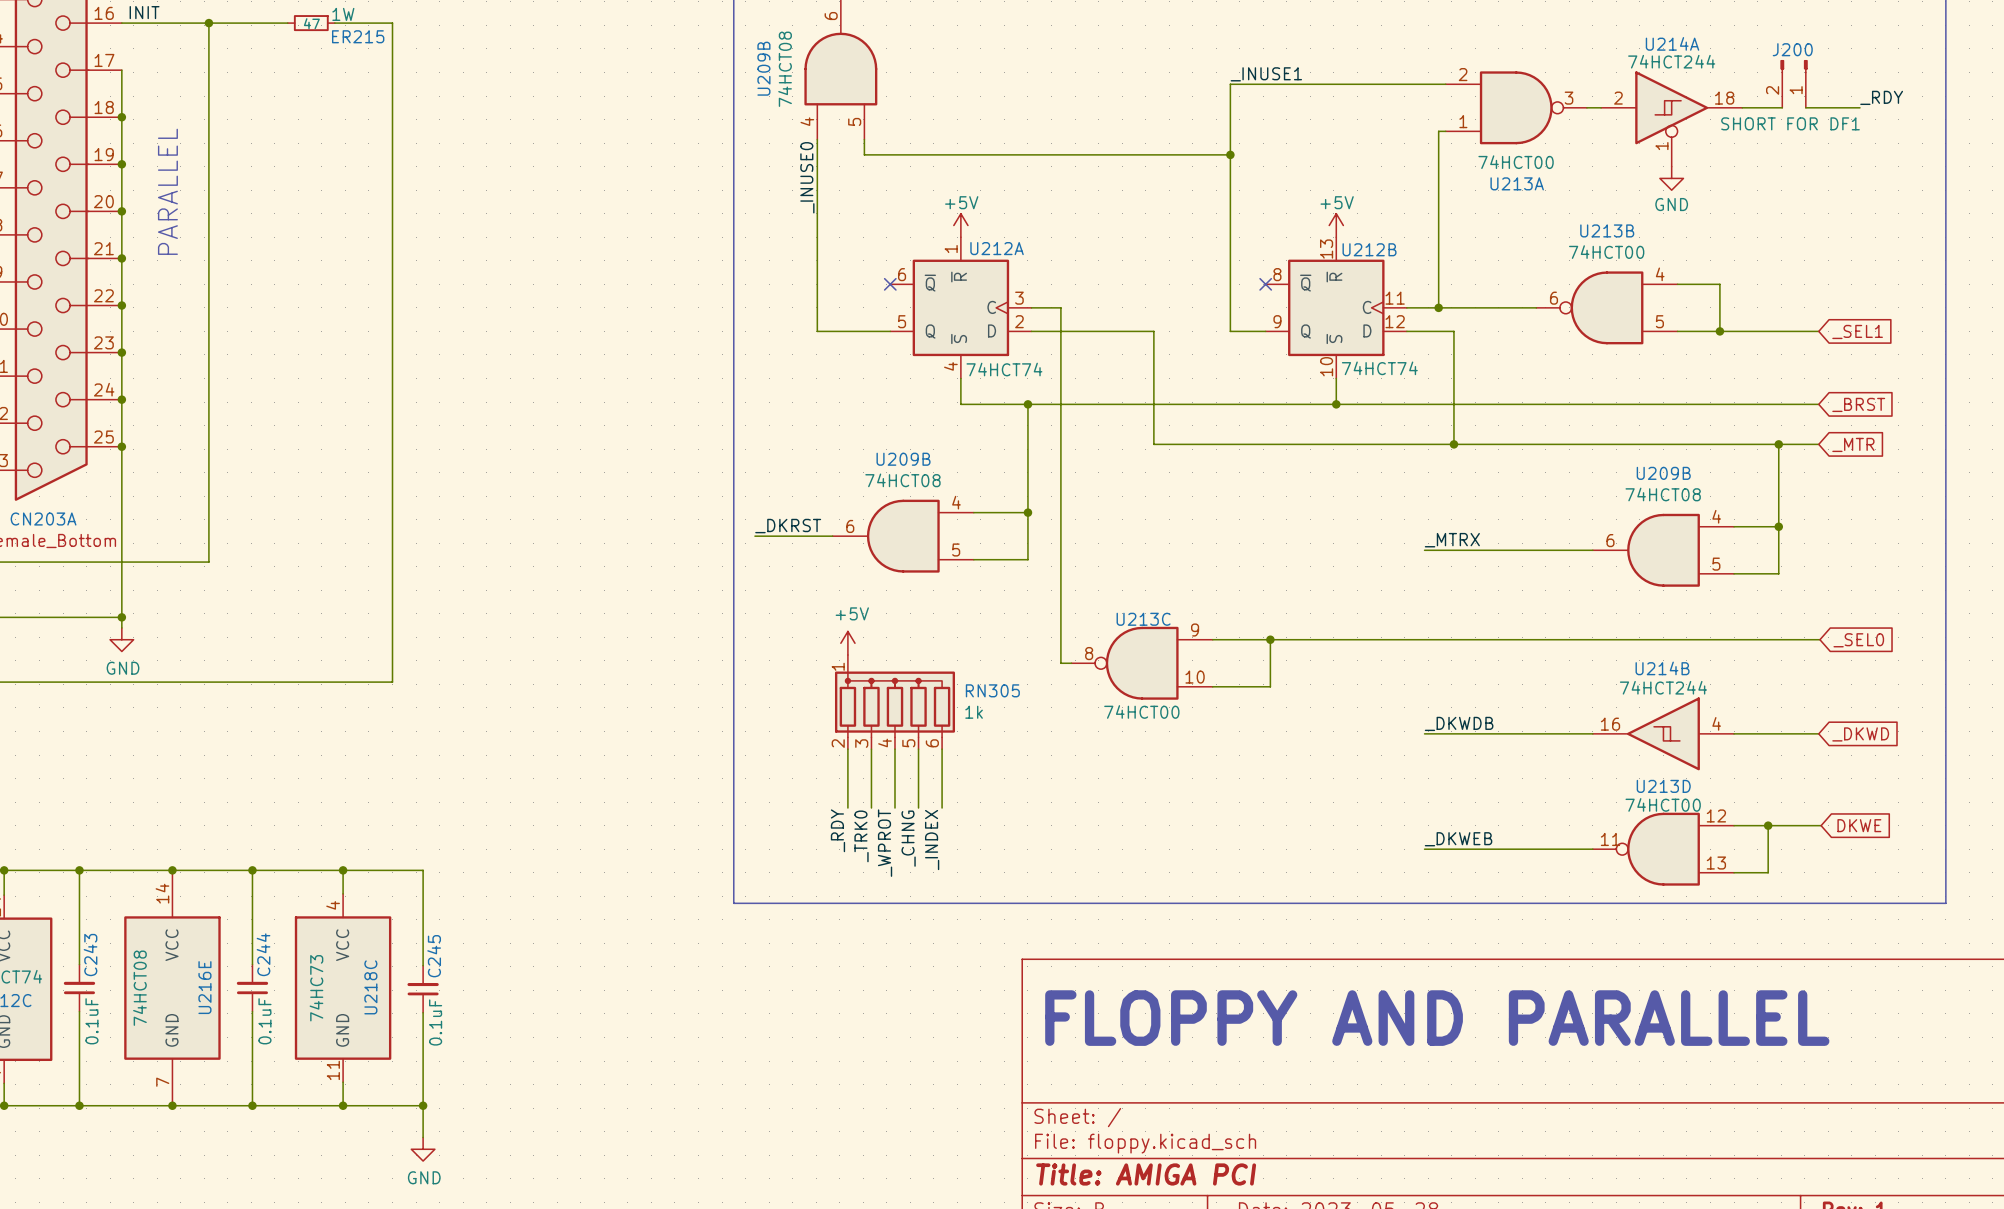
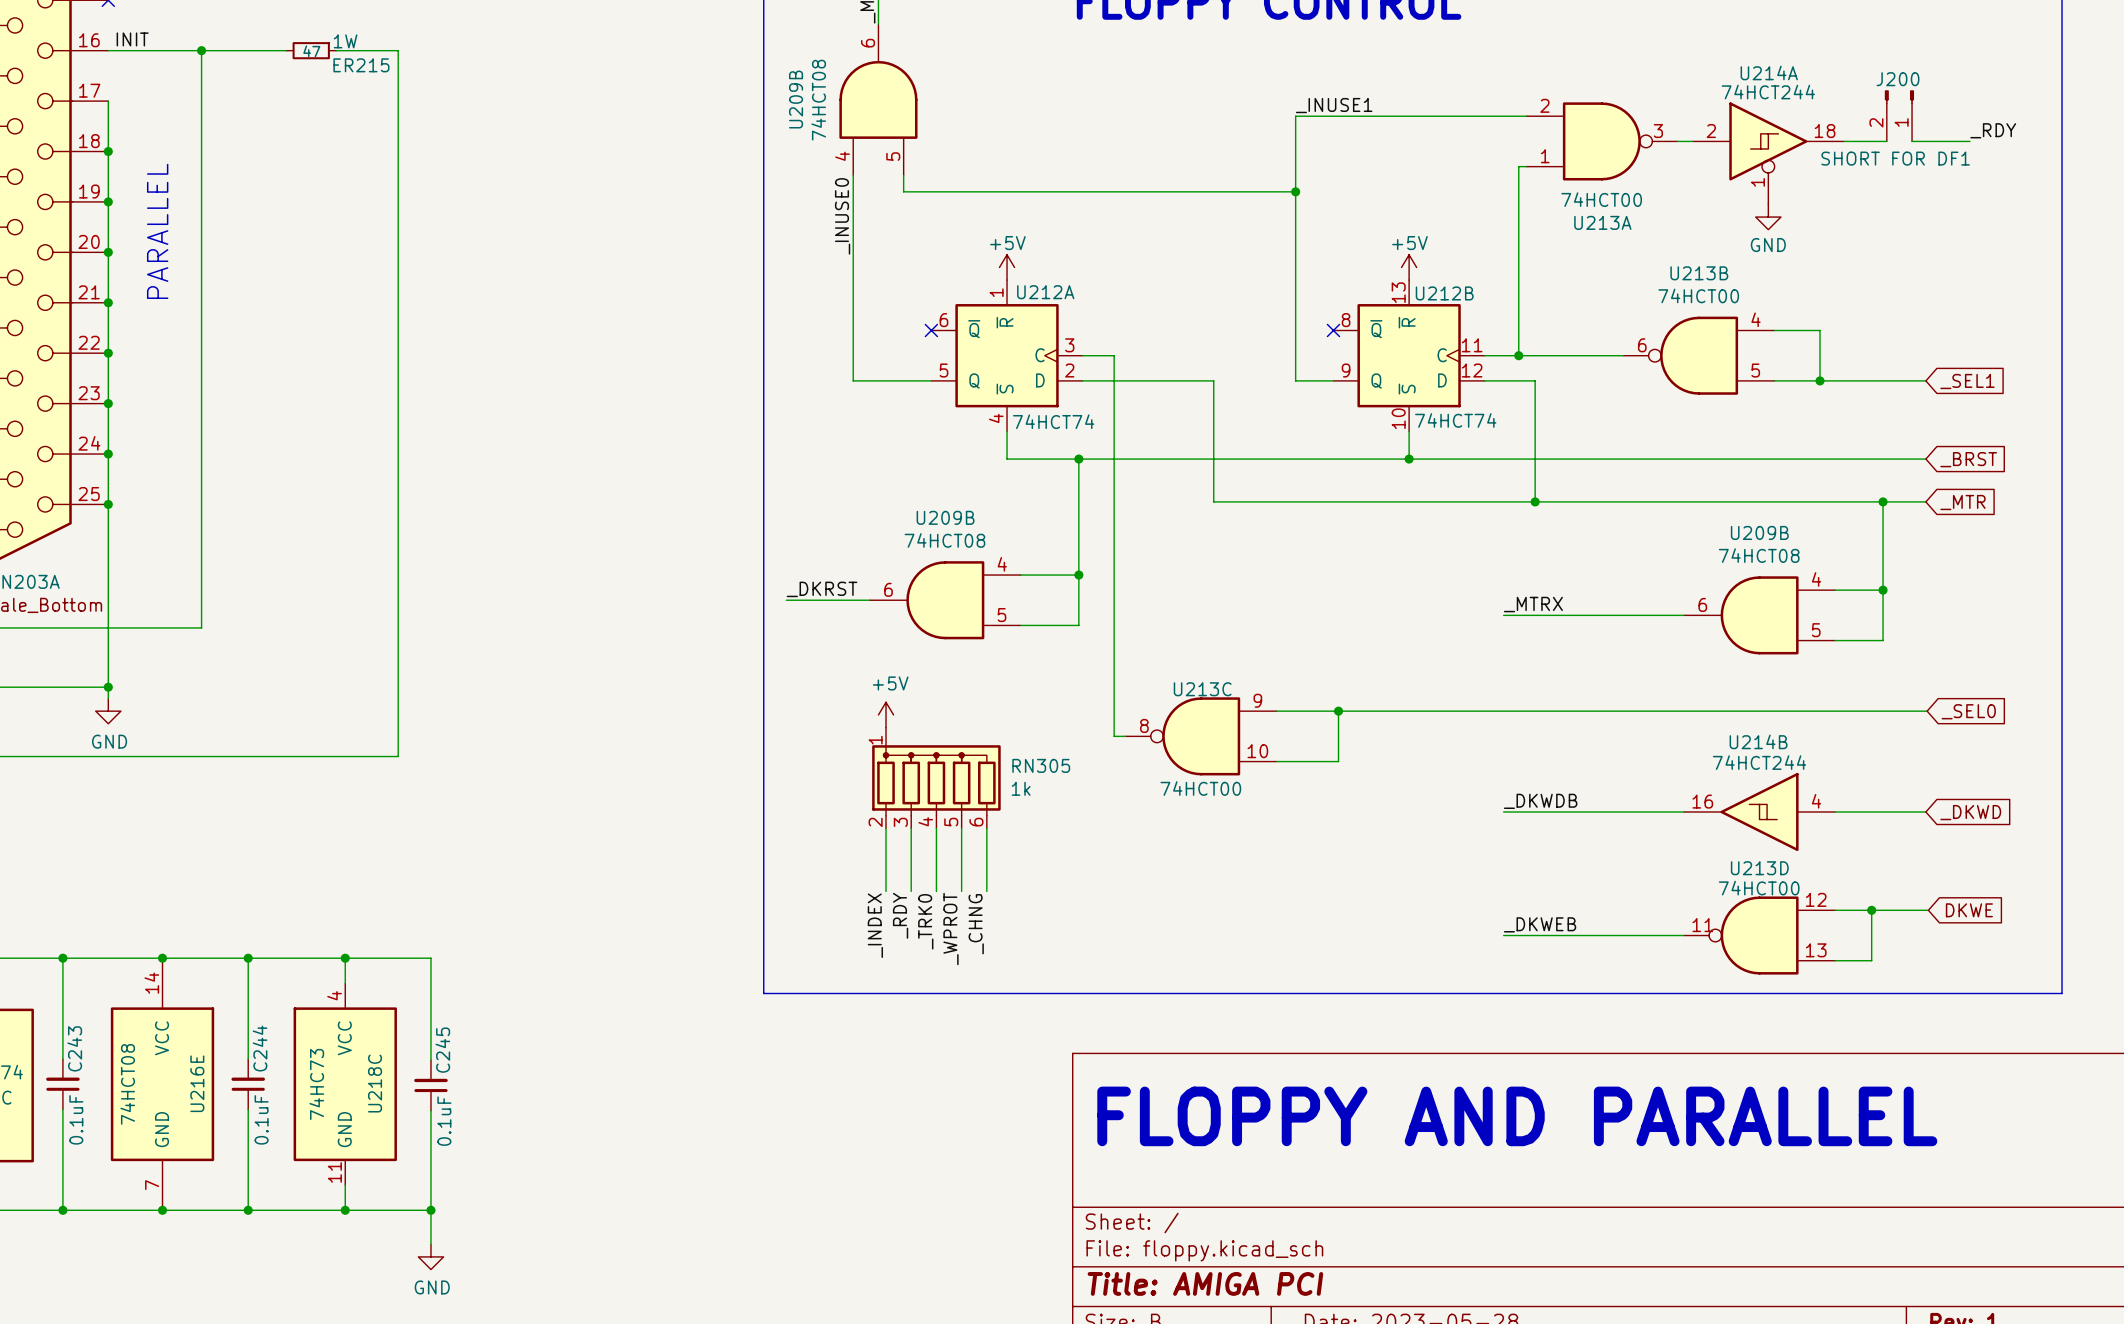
label: _RDY (837, 830) -> _INDEX (875, 925)
label: _TRK0 (861, 836) -> _RDY (900, 915)
label: _CHNG (908, 838) -> _WPROT (950, 929)
label: _INDEX (932, 840) -> _CHNG (976, 924)
label: _WPROT (885, 843) -> _TRK0 (925, 921)

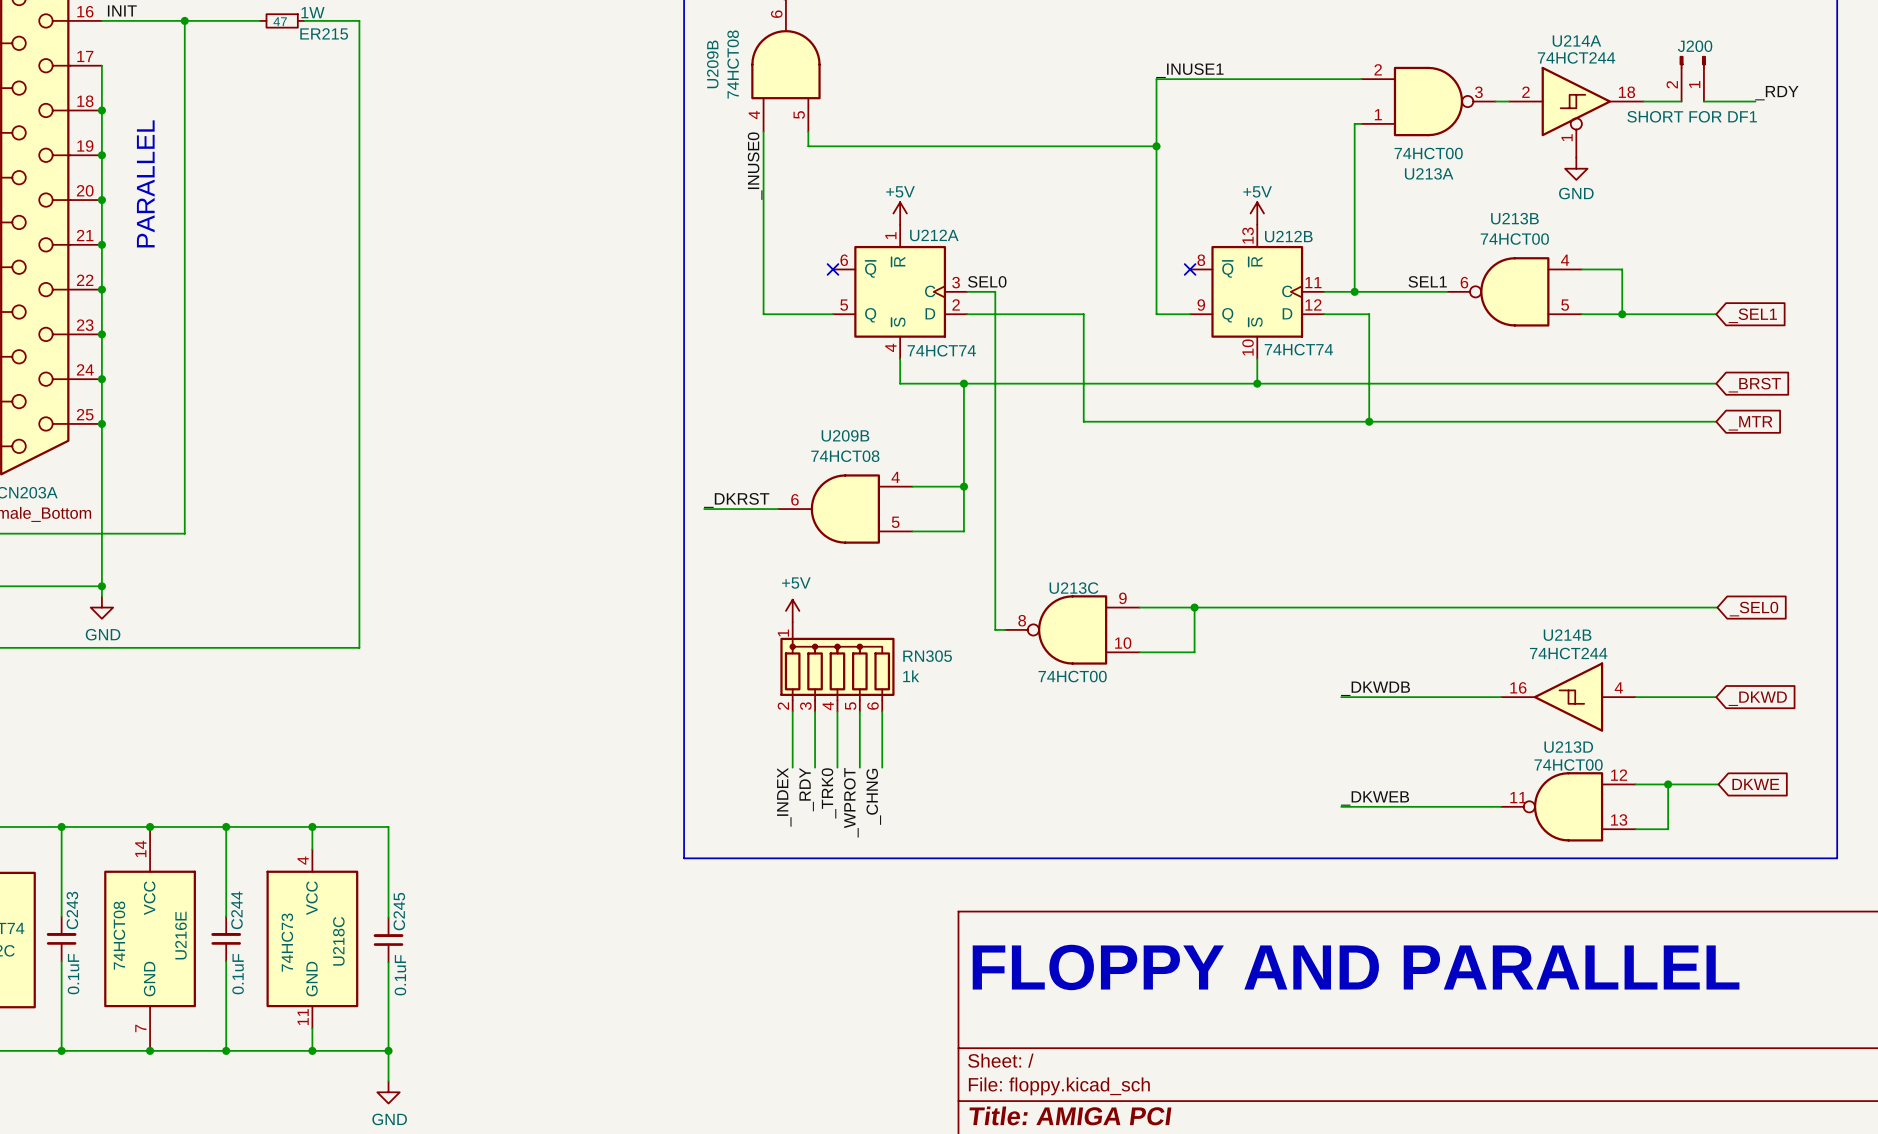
label: none -> SEL0 (987, 281)
label: none -> SEL1 (1427, 281)
wire: (1883, 501) (1883, 640) (1835, 640) -> none
junction: (1883, 501) -> none
wire: (1835, 590) (1883, 590) -> none
junction: (1883, 590) -> none
label: _MTRX (1533, 604) -> none
wire: (1503, 615) (1683, 615) -> none
U209B: 74HCT08 (1759, 615) -> none

